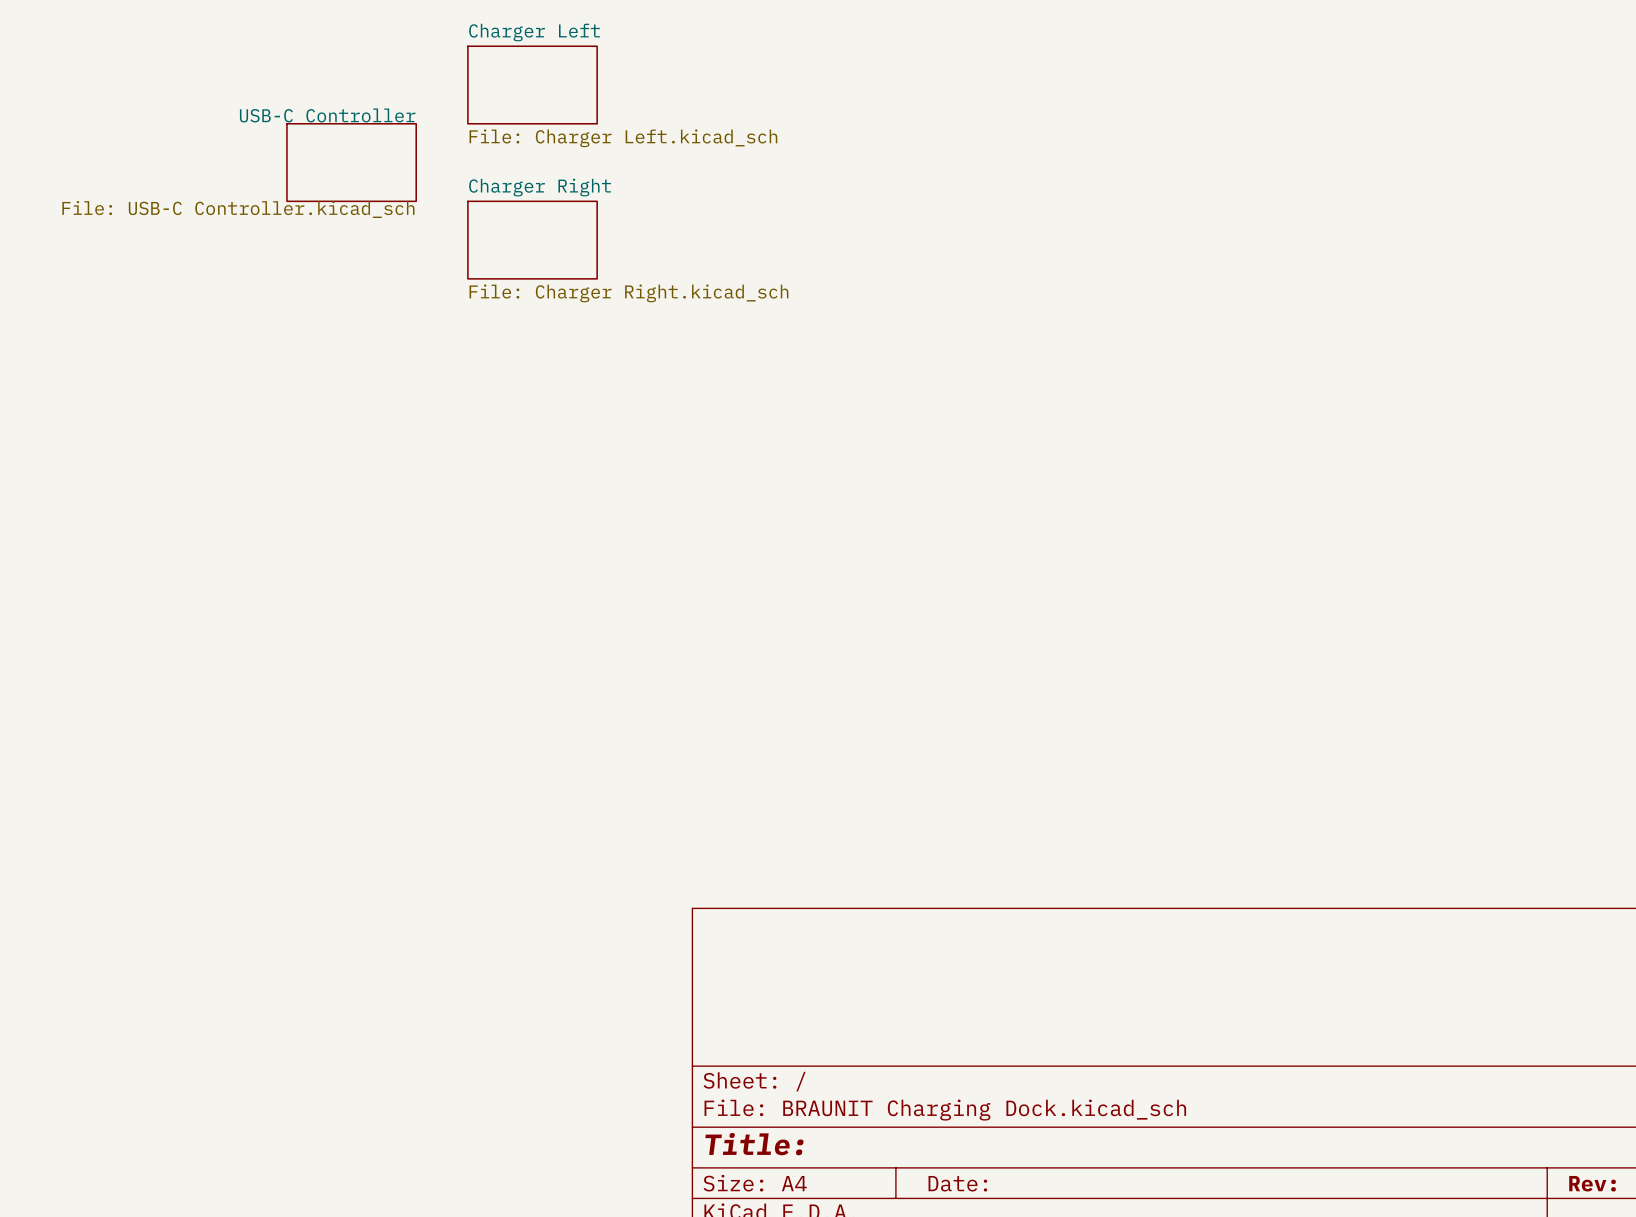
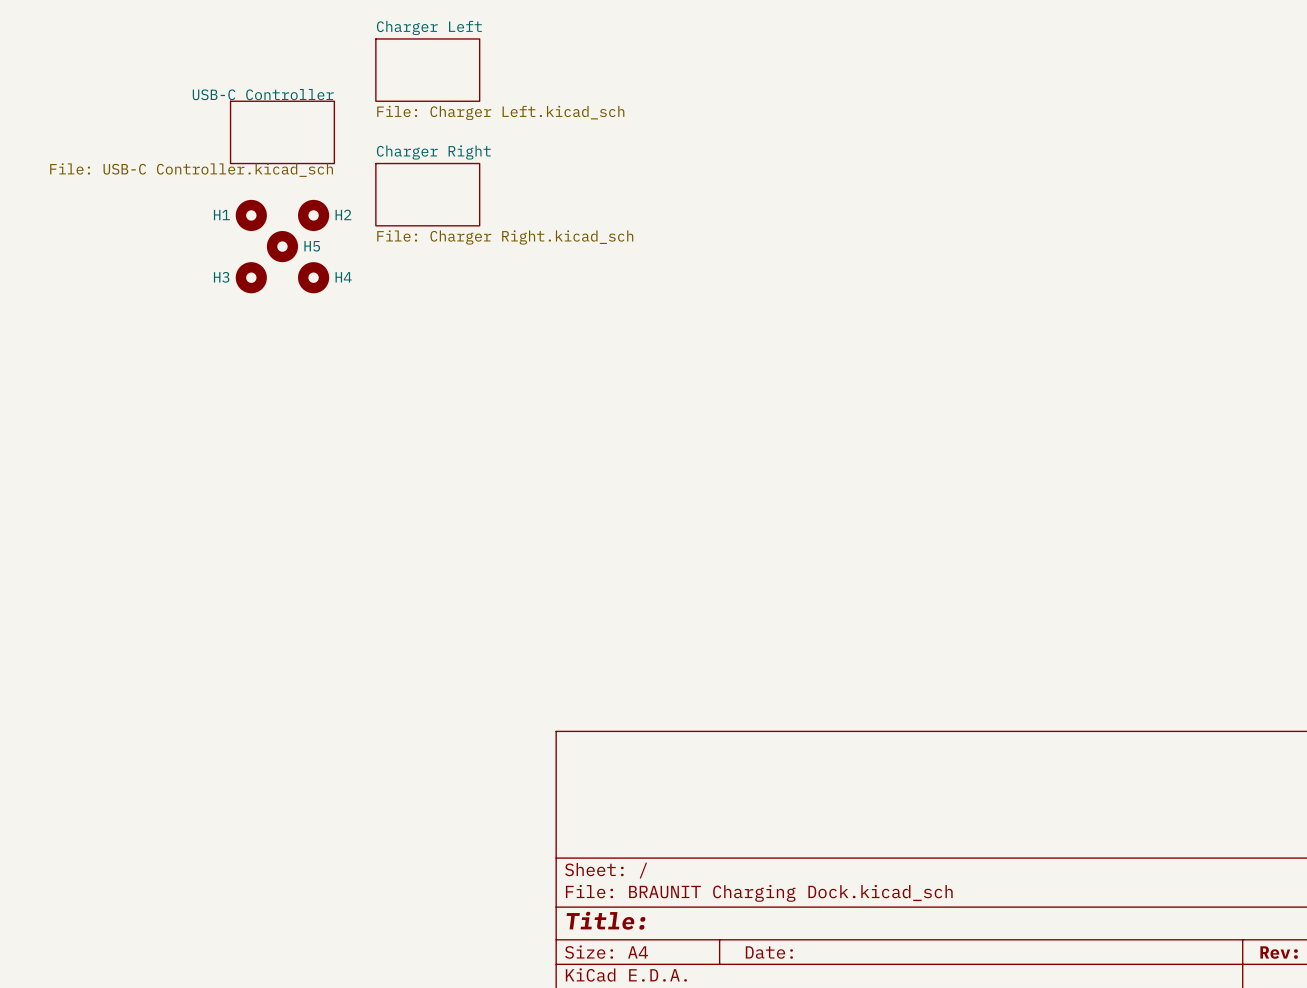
H1: none -> (251, 215)
H2: none -> (313, 215)
H5: none -> (282, 246)
H3: none -> (251, 277)
H4: none -> (313, 277)

